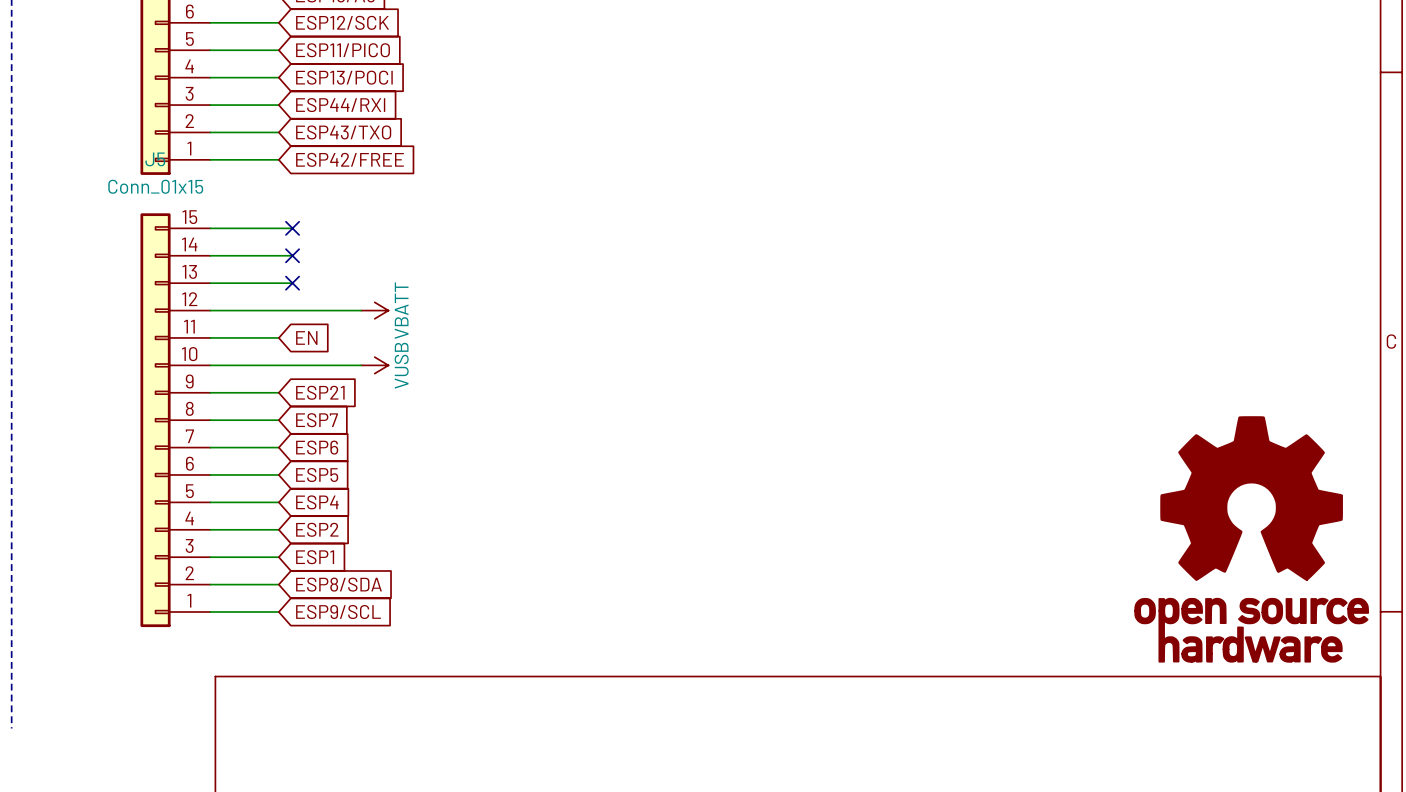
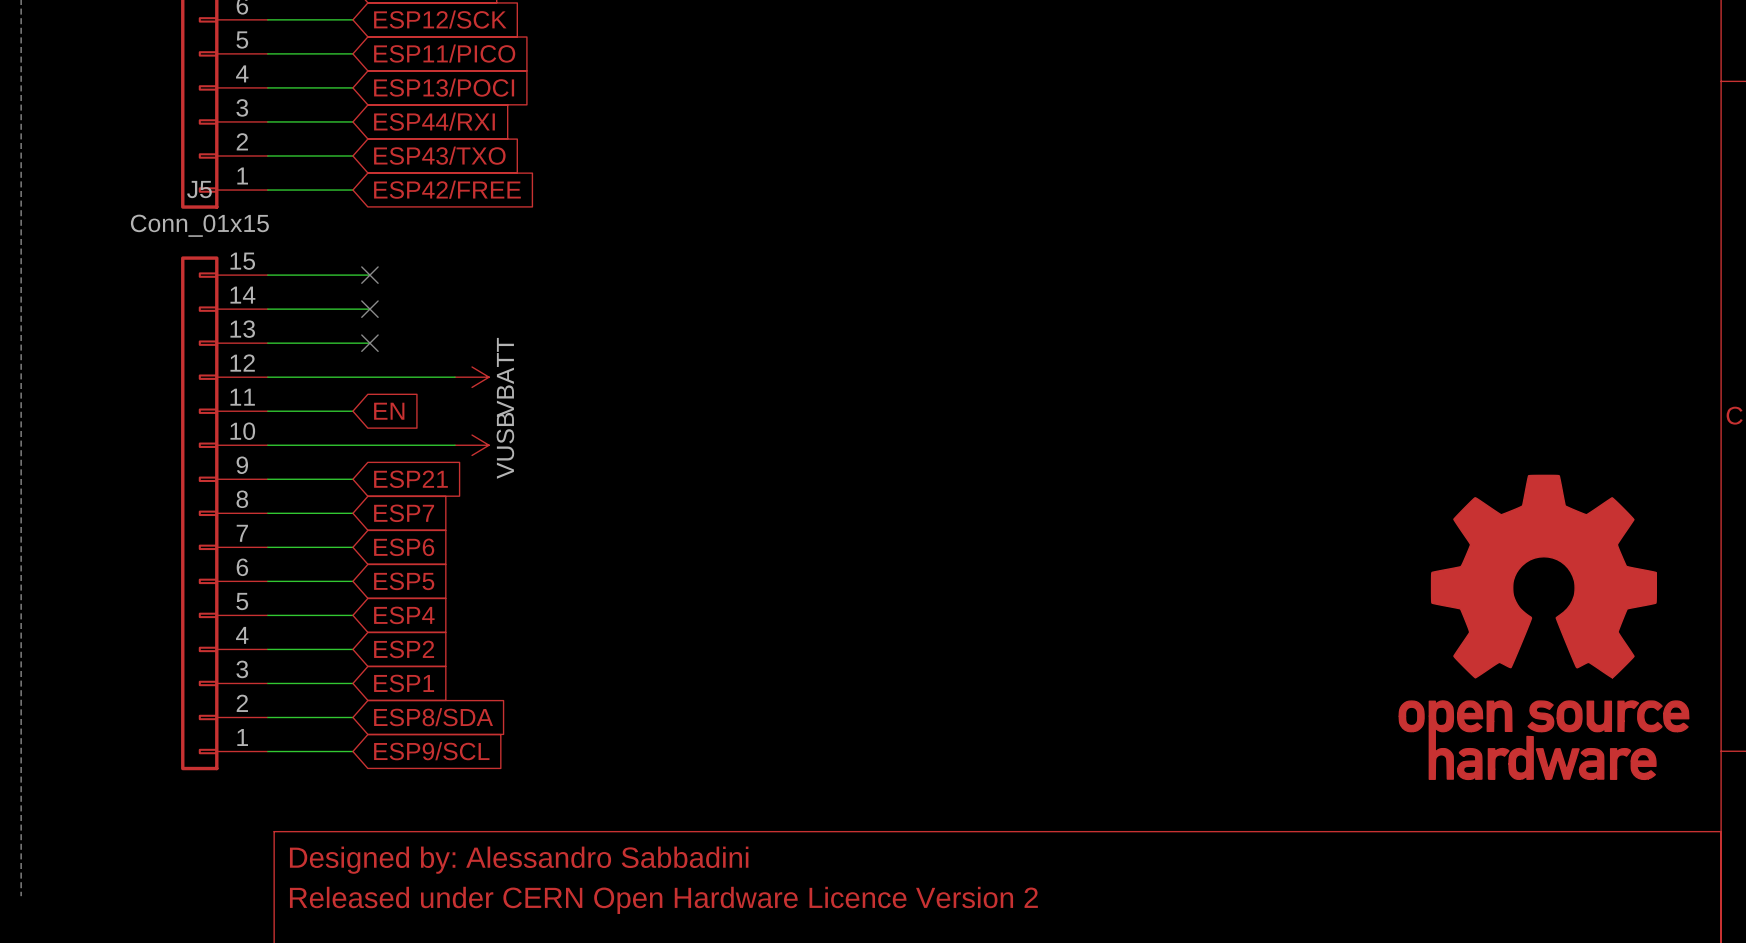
part position: (1251, 539) -> (1544, 627)
title block: none -> Designed by: Alessandro Sabbadini (519, 860)
title block: none -> Released under CERN Open Hardware Licence Version 2 (663, 900)

